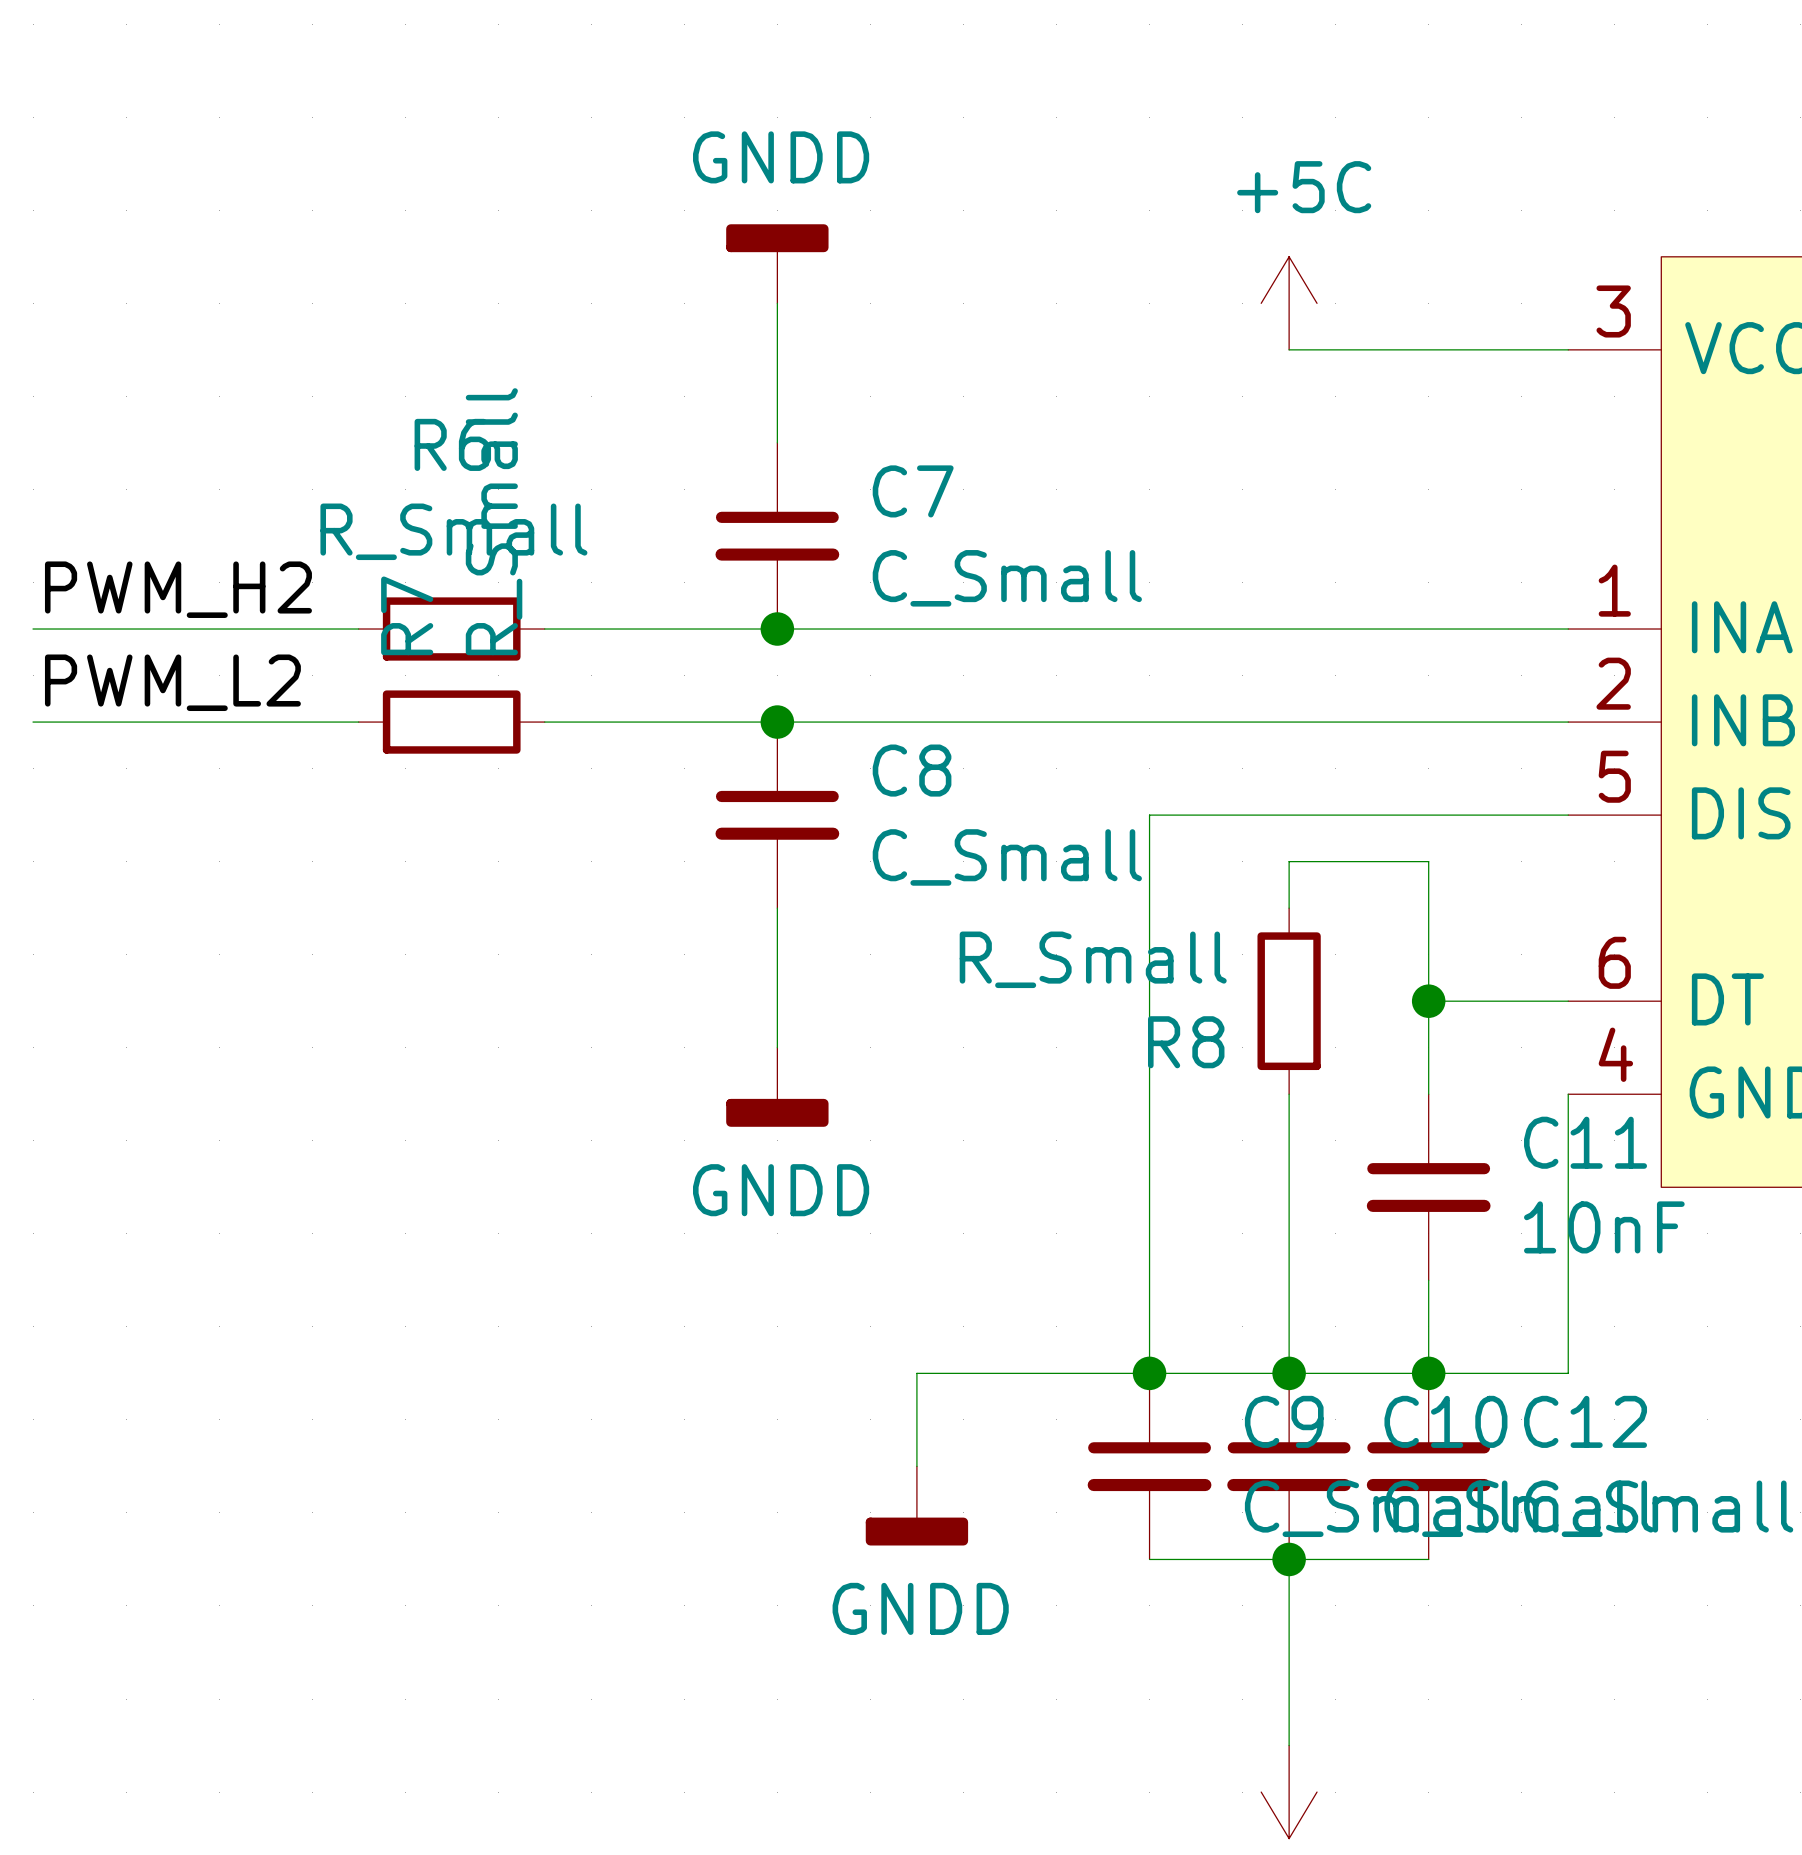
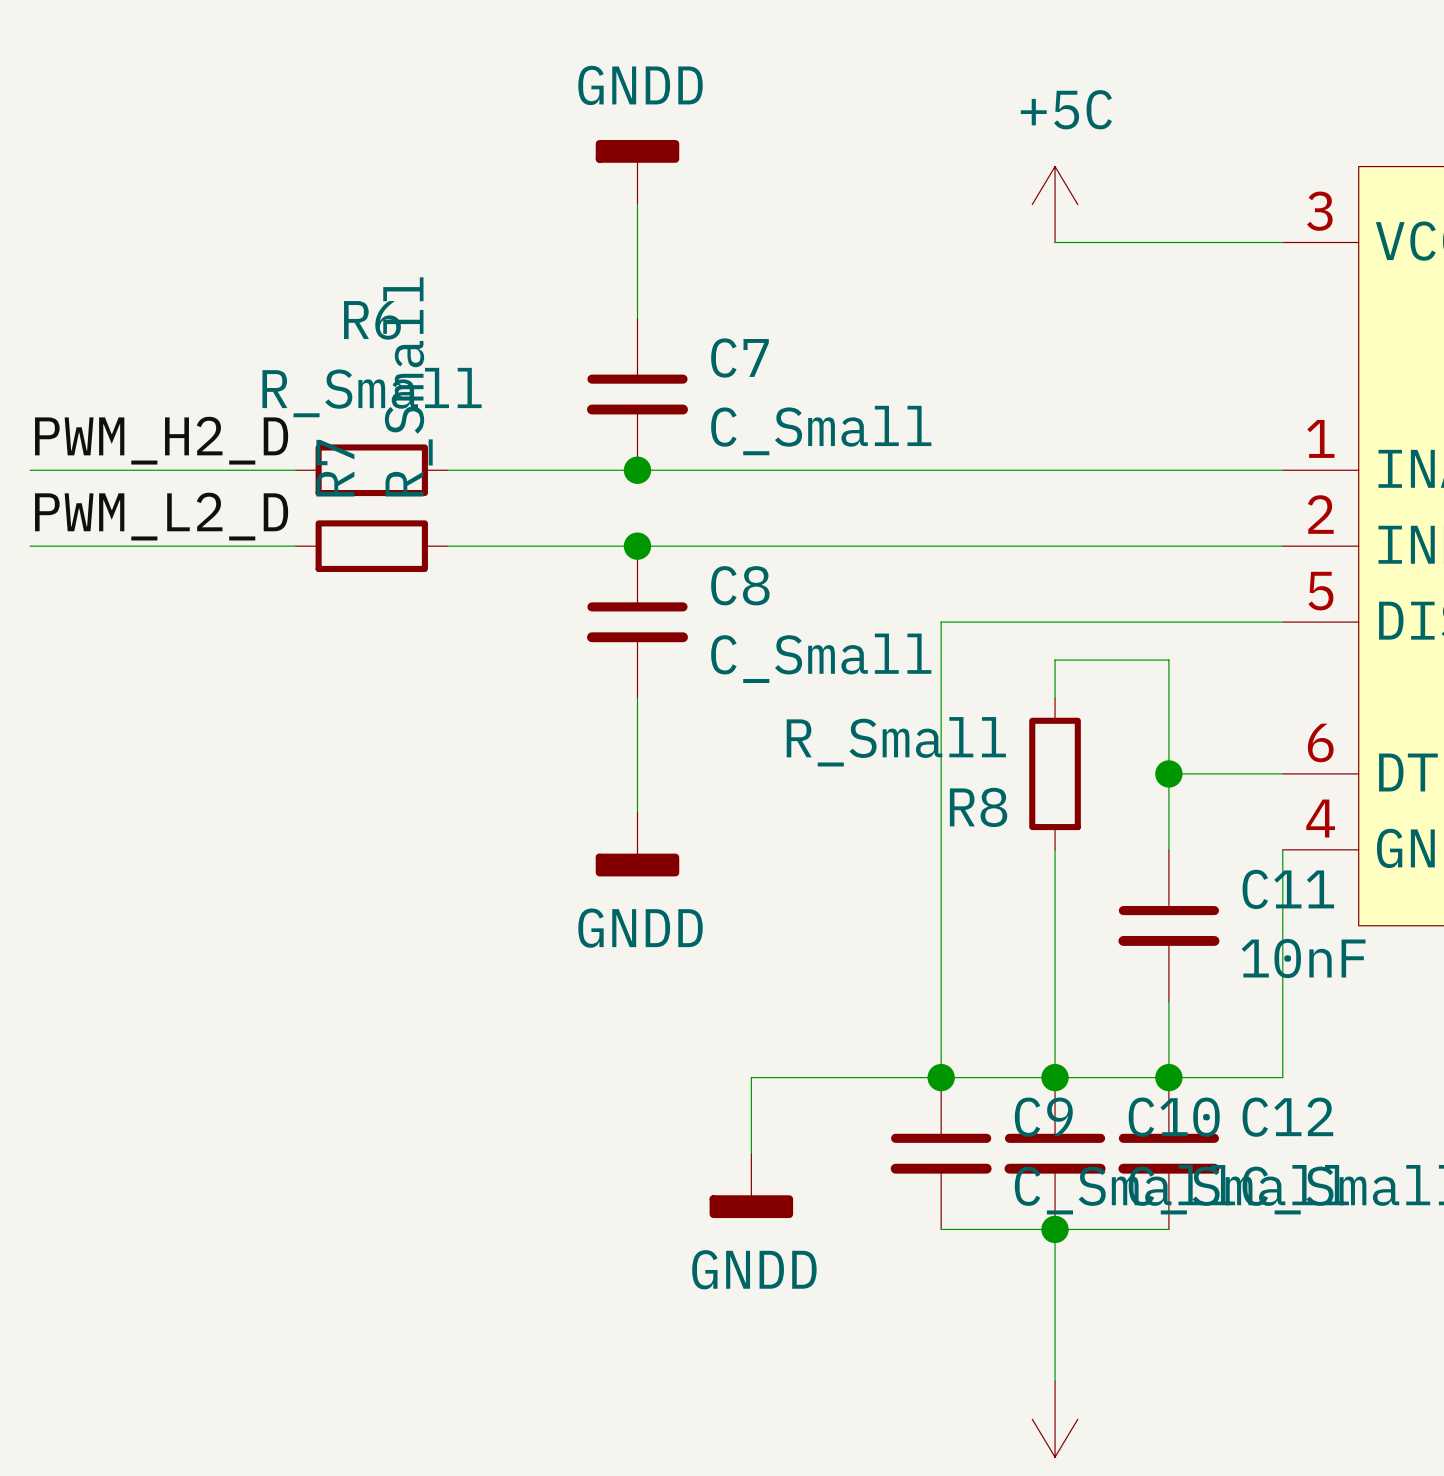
label: PWM_H2 (178, 589) -> PWM_H2_D (161, 440)
label: PWM_L2 (172, 682) -> PWM_L2_D (161, 516)

